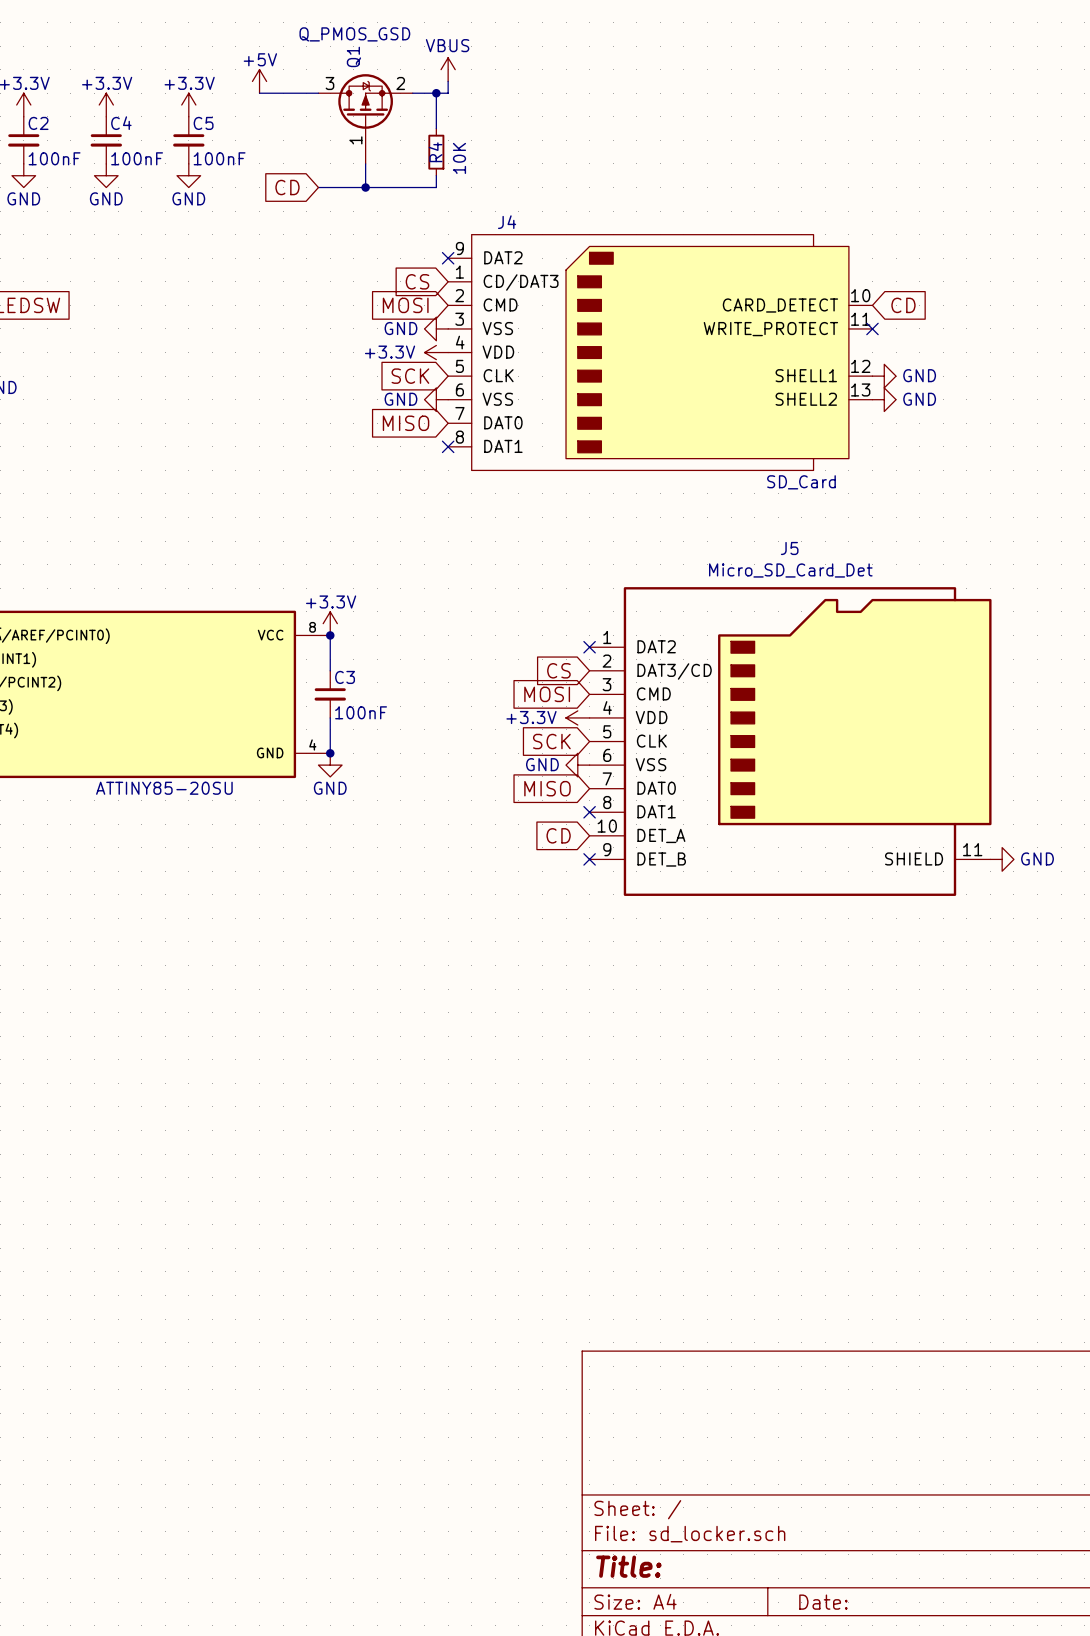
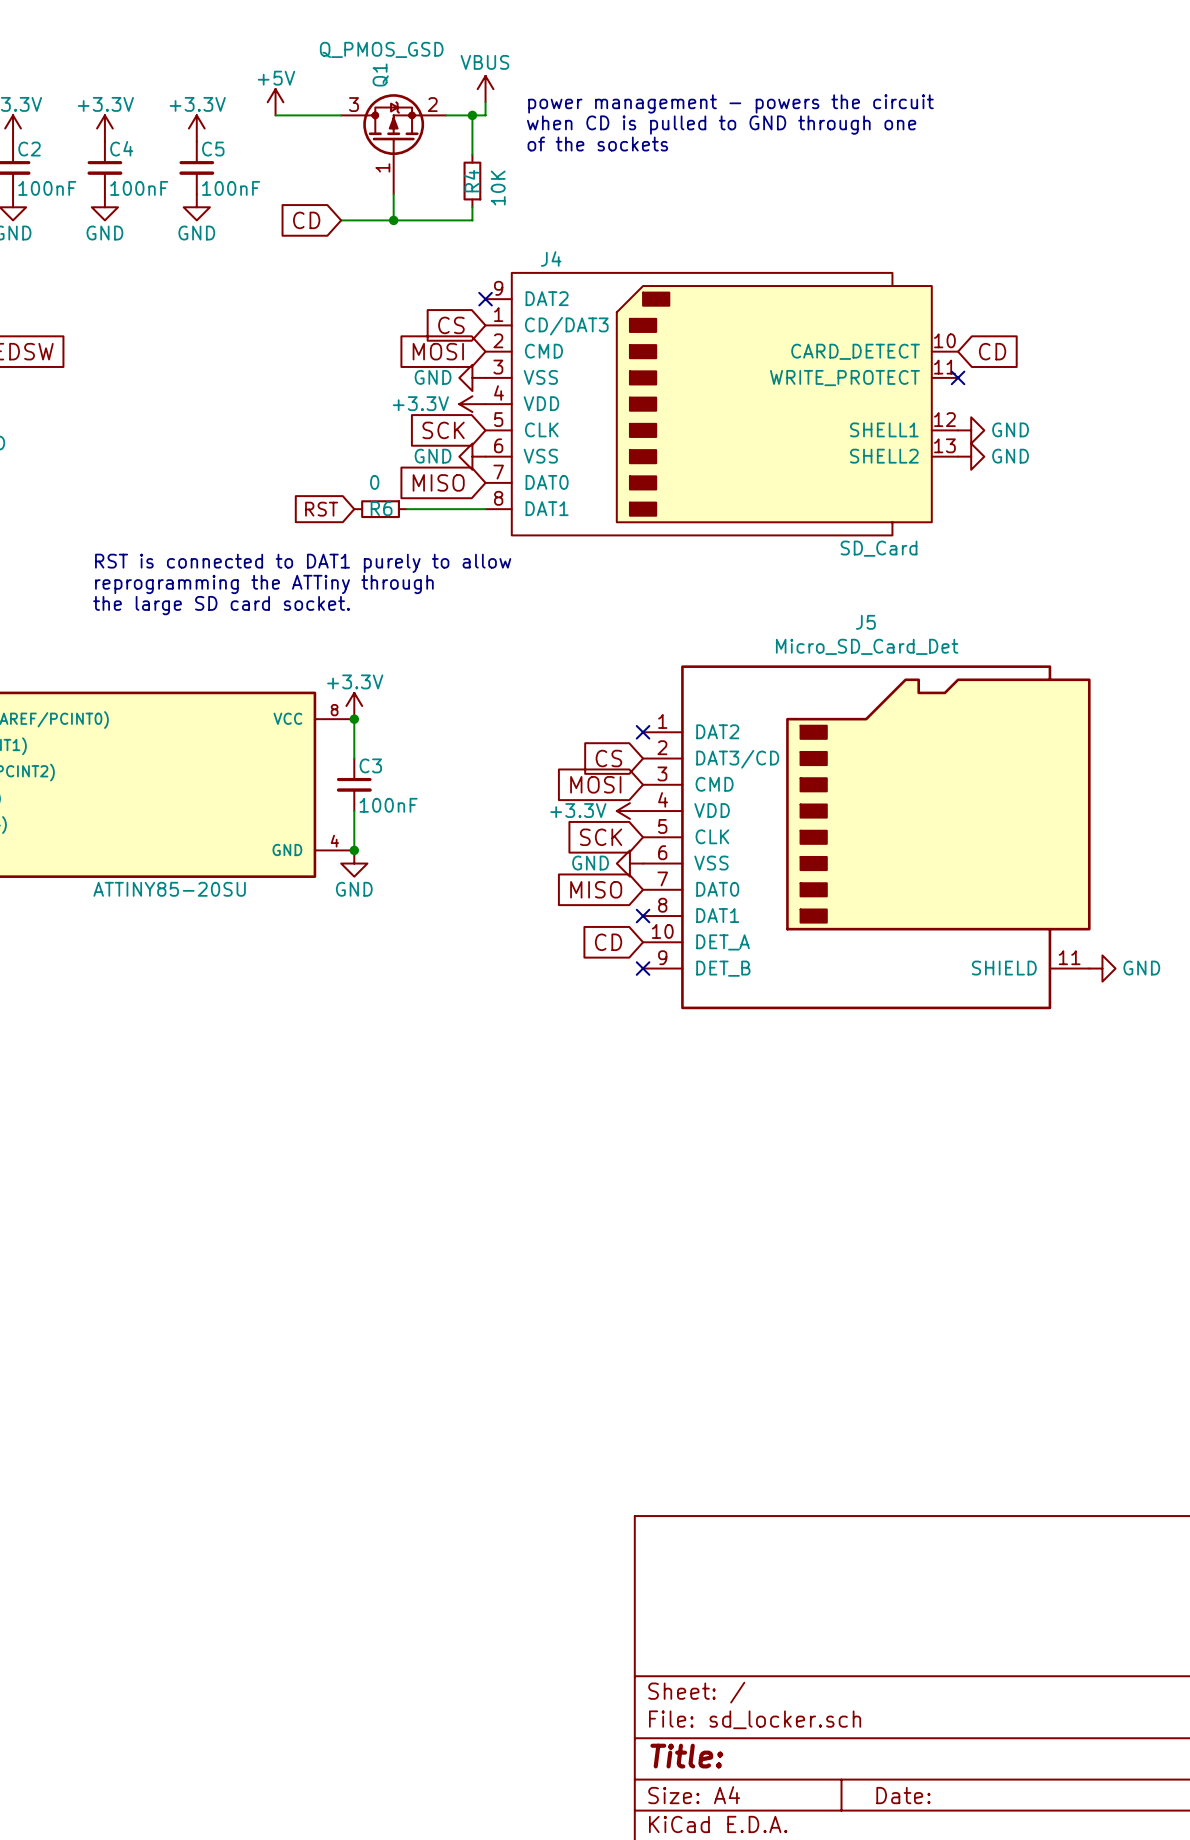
text: none -> power management - powers the circuit (730, 103)
text: none -> when CD is pulled to GND through one (721, 125)
text: none -> of the sockets (597, 144)
global label: none -> RST (321, 509)
R6: none -> 0 (380, 509)
wire: none -> (406, 509) (485, 509)
no-connect mark: (448, 446) -> none
text: none -> RST is connected to DAT1 purely to allow (303, 563)
text: none -> reprogramming the ATTiny through (264, 584)
text: none -> the large SD card socket. (221, 605)

